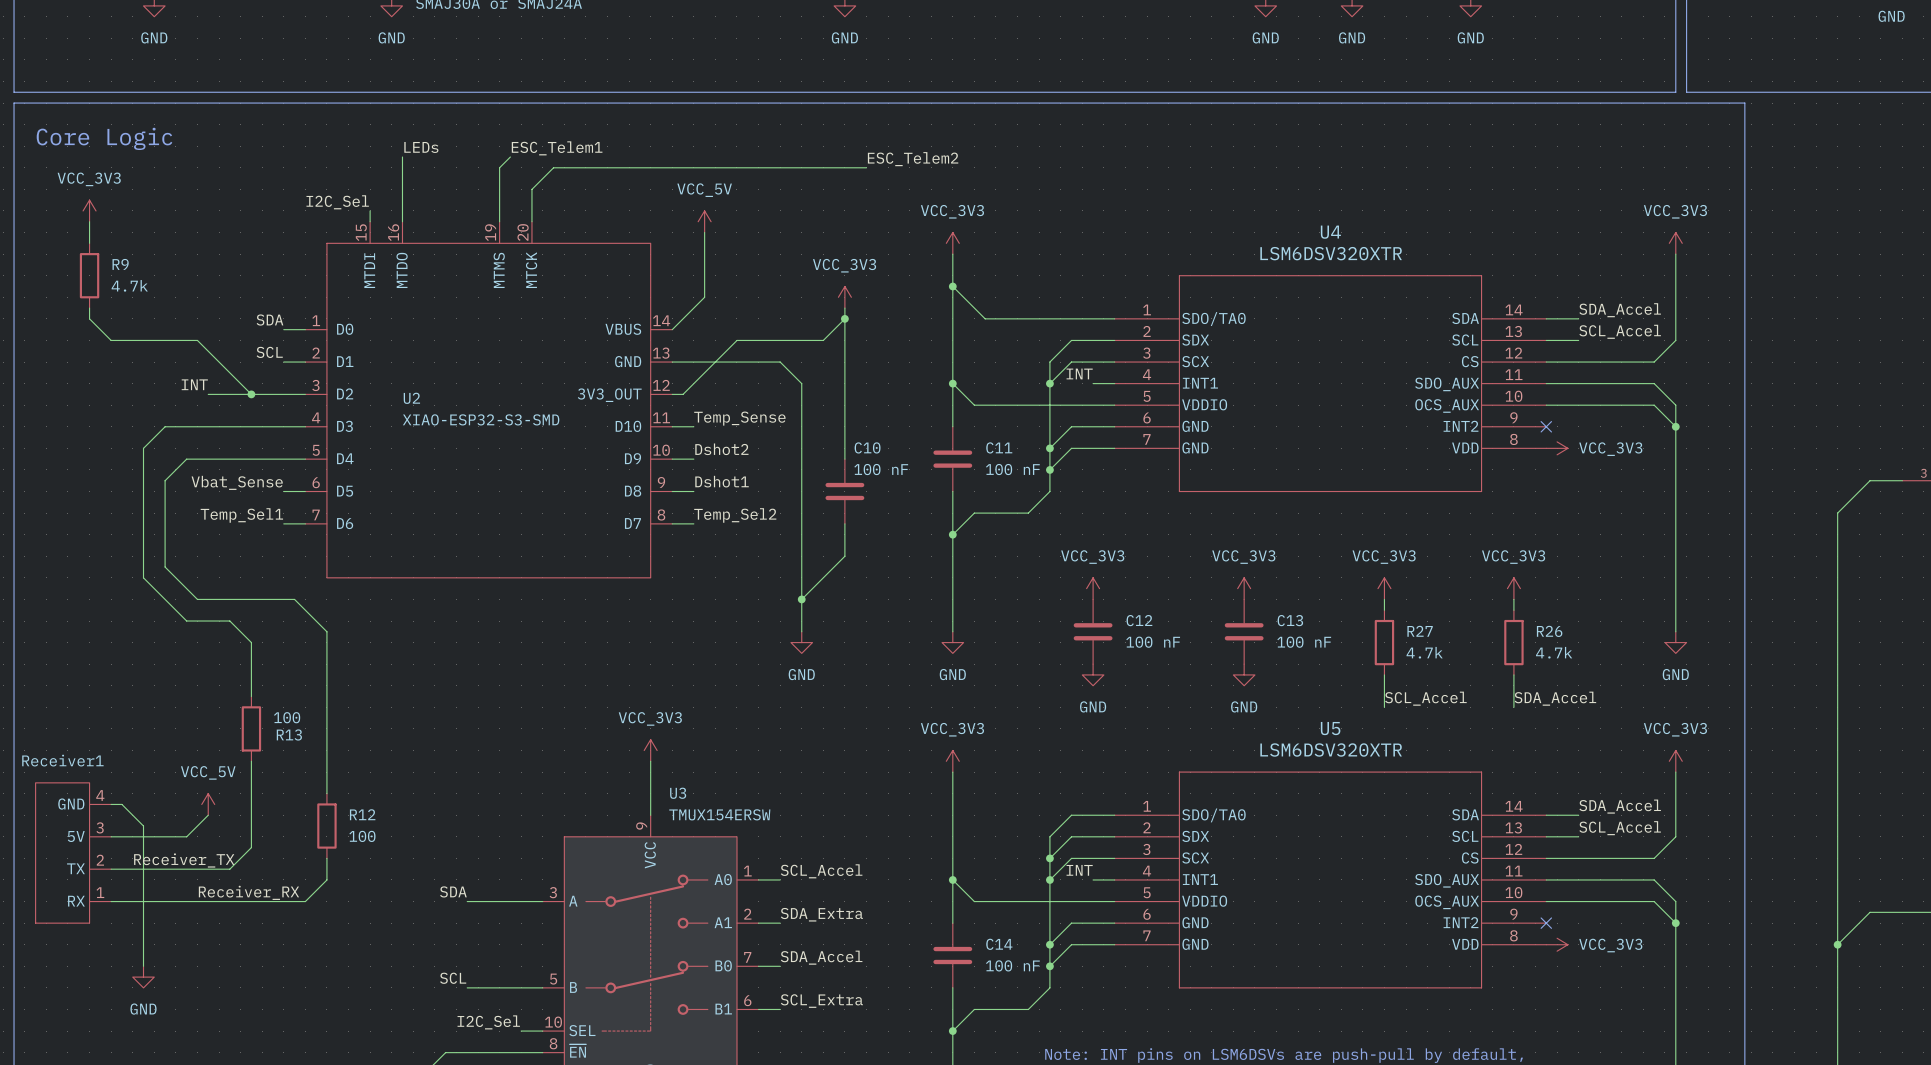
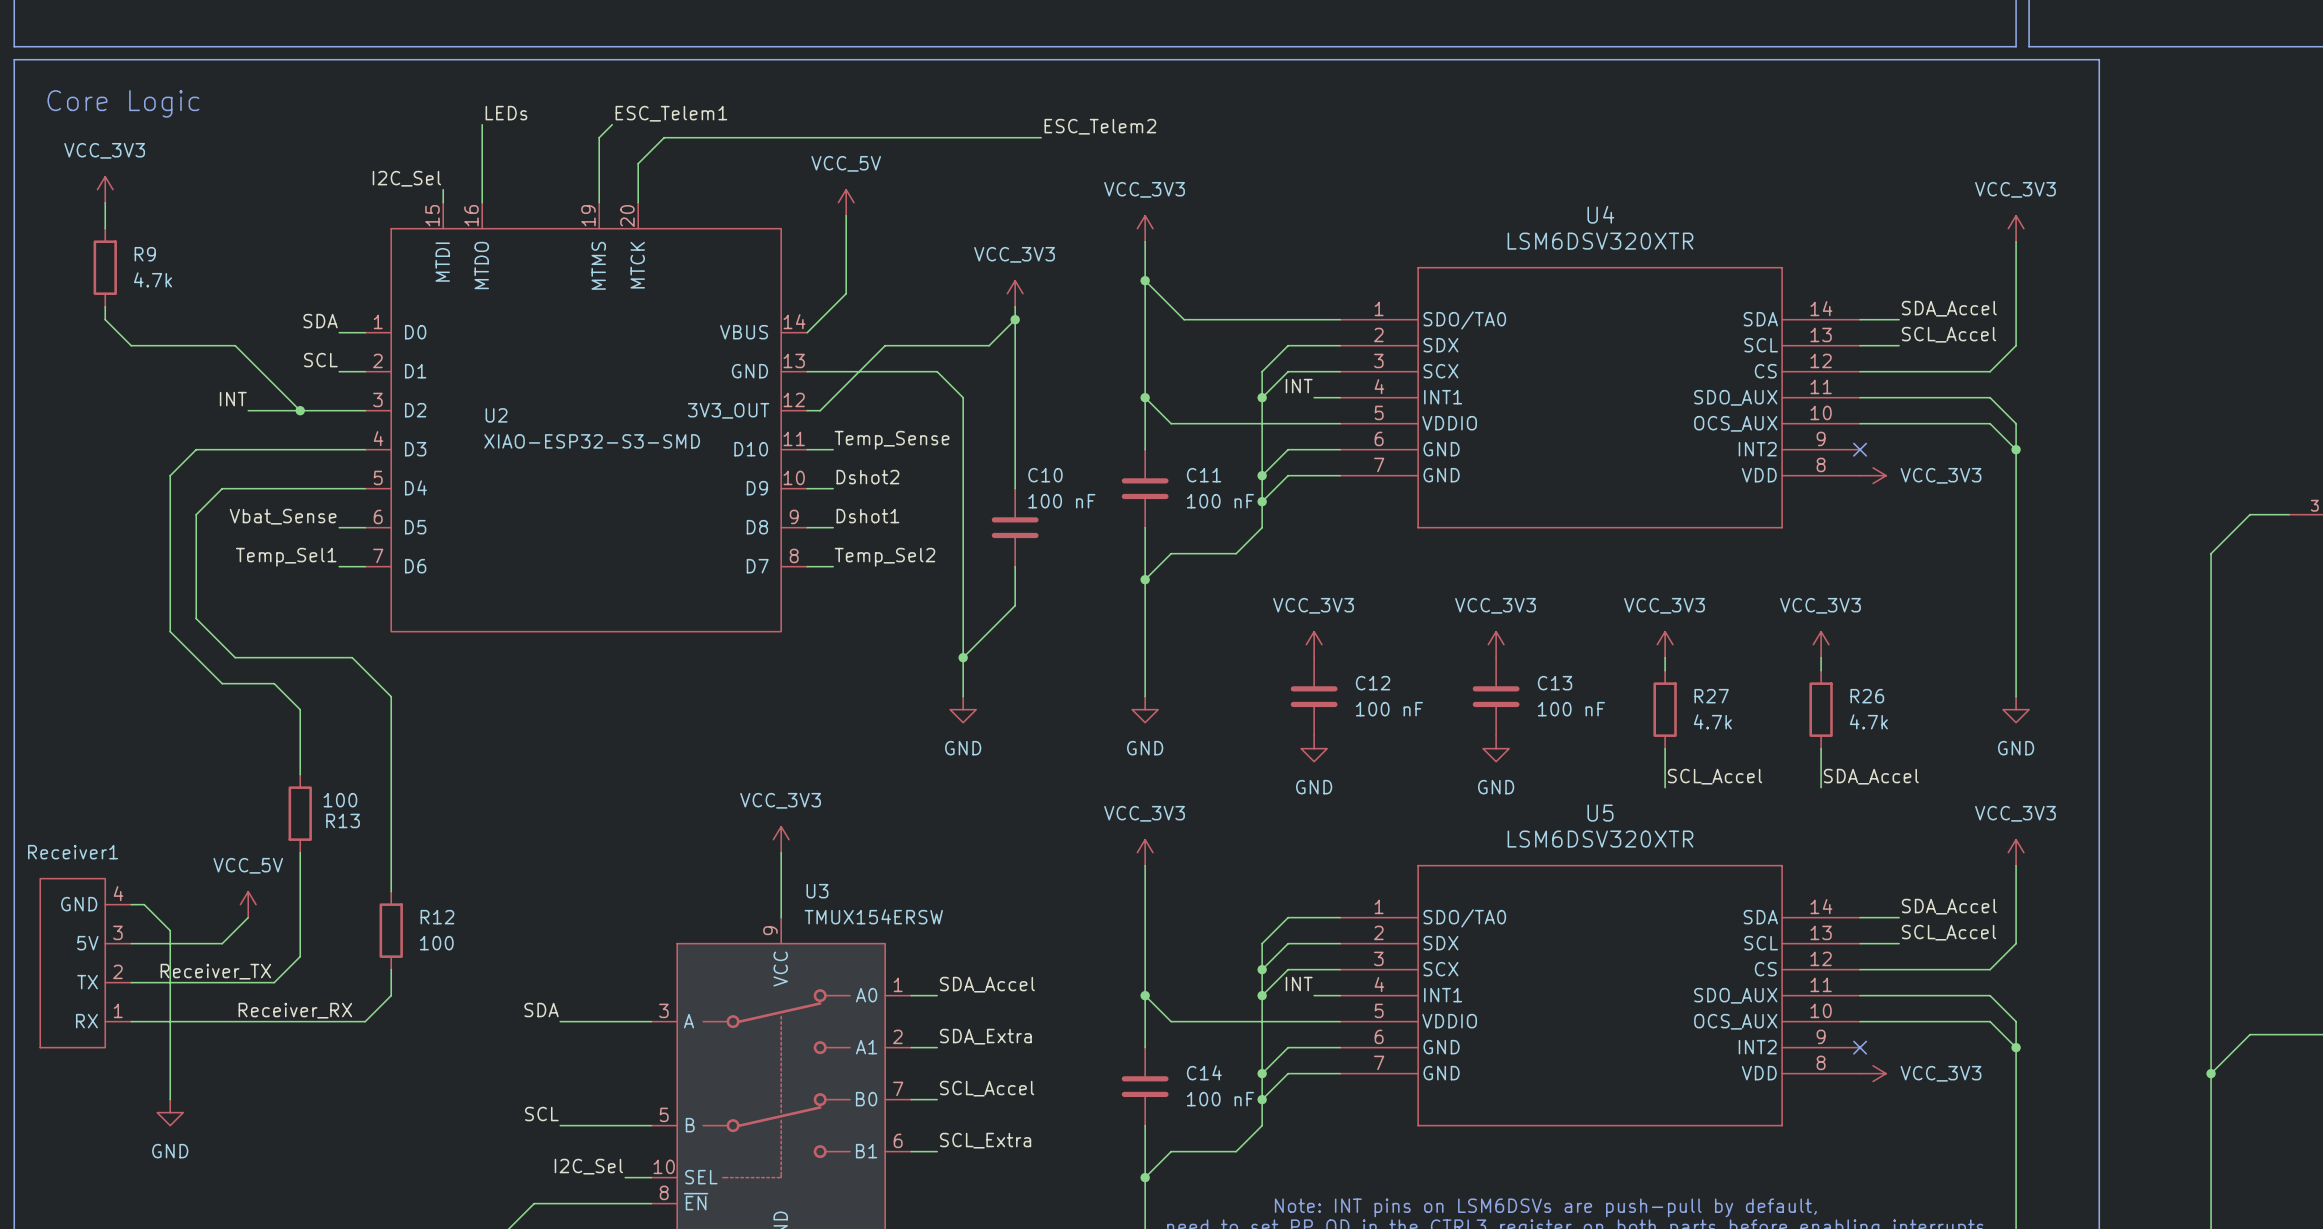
label: SCL_Accel (821, 871) -> SDA_Accel (987, 984)
label: SDA_Accel (821, 957) -> SCL_Accel (987, 1088)

